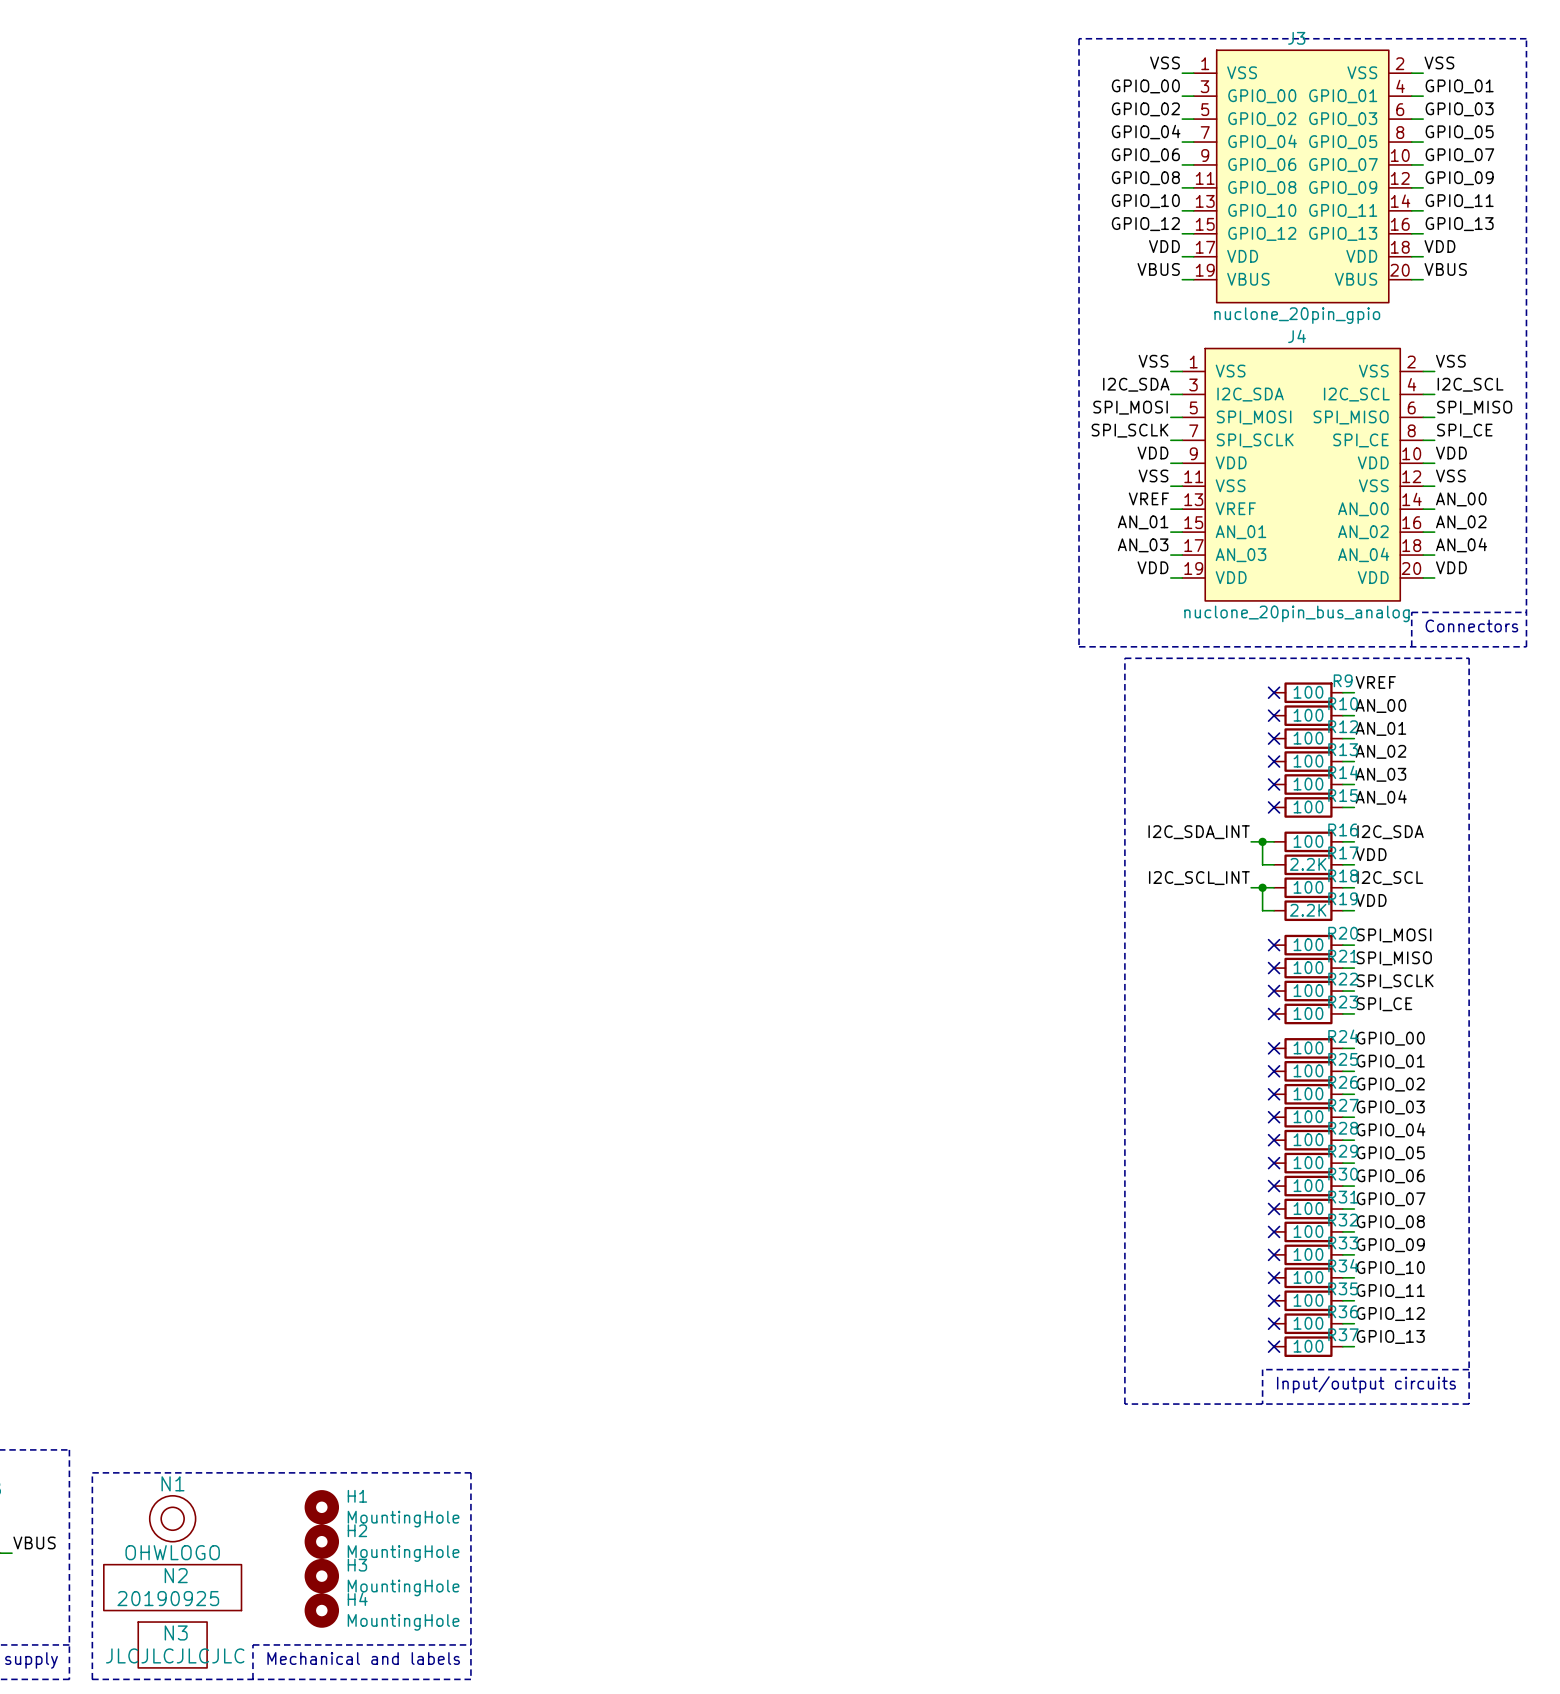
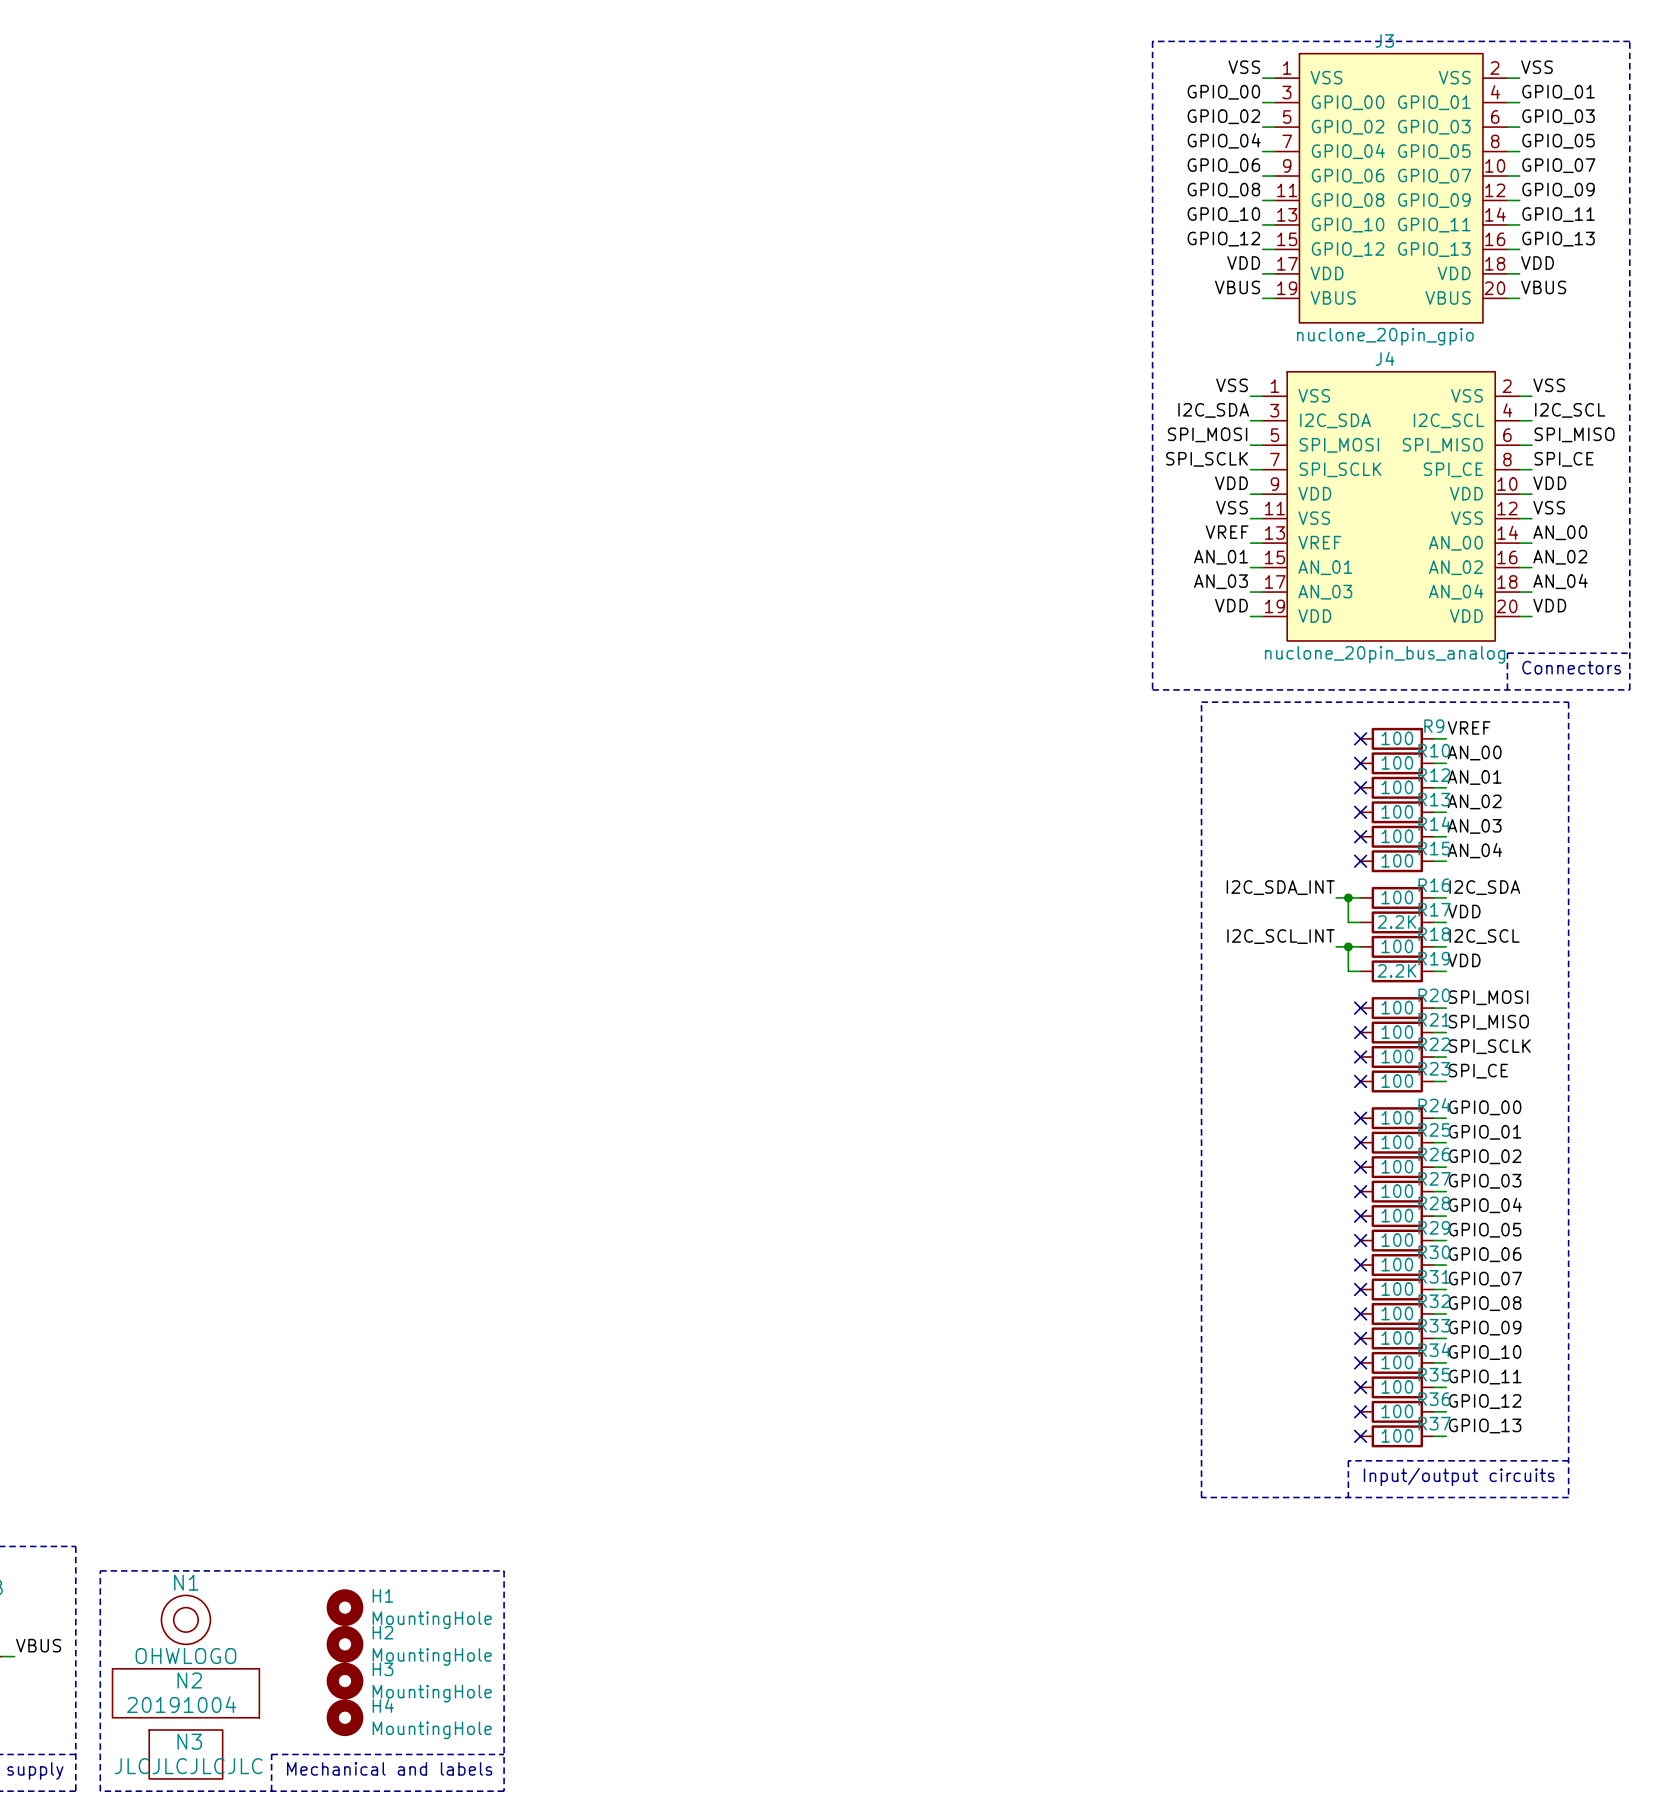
N2 value: 20190925 (168, 1598) -> 20191004 (181, 1704)

